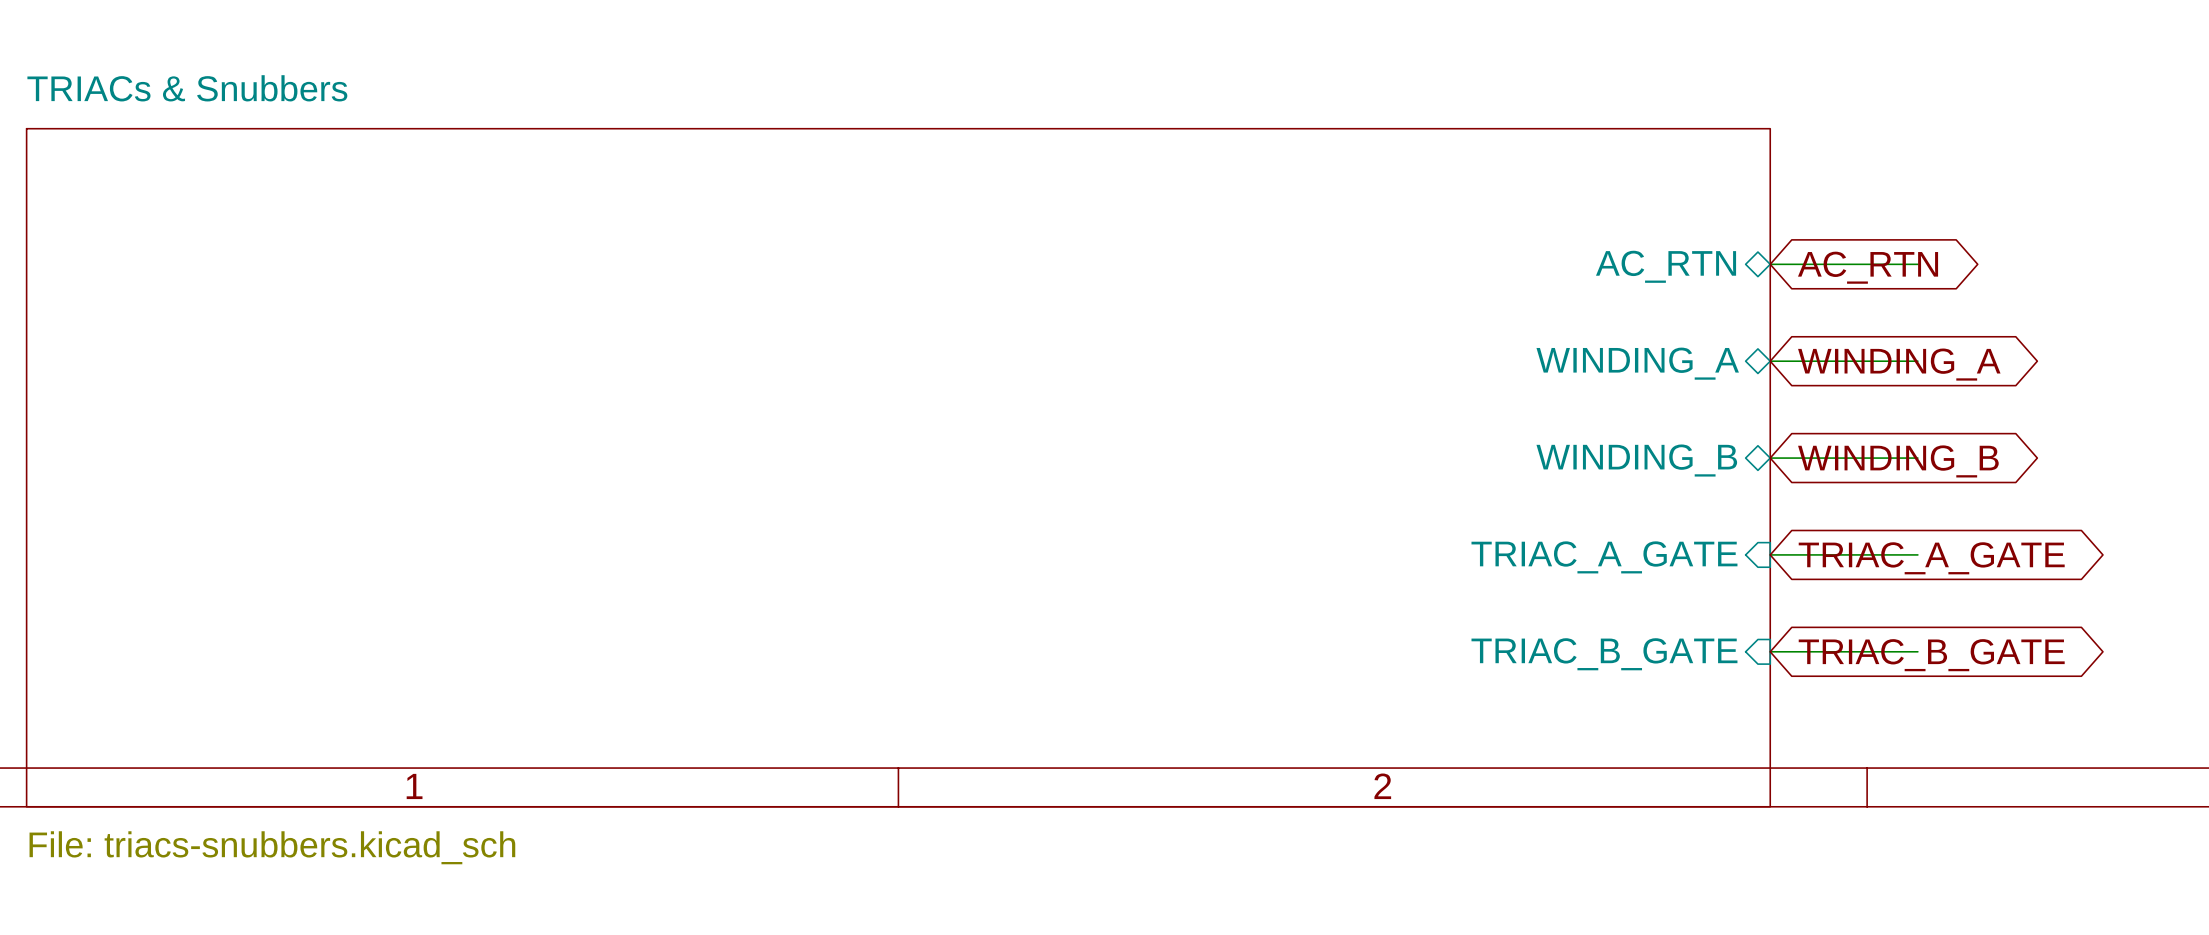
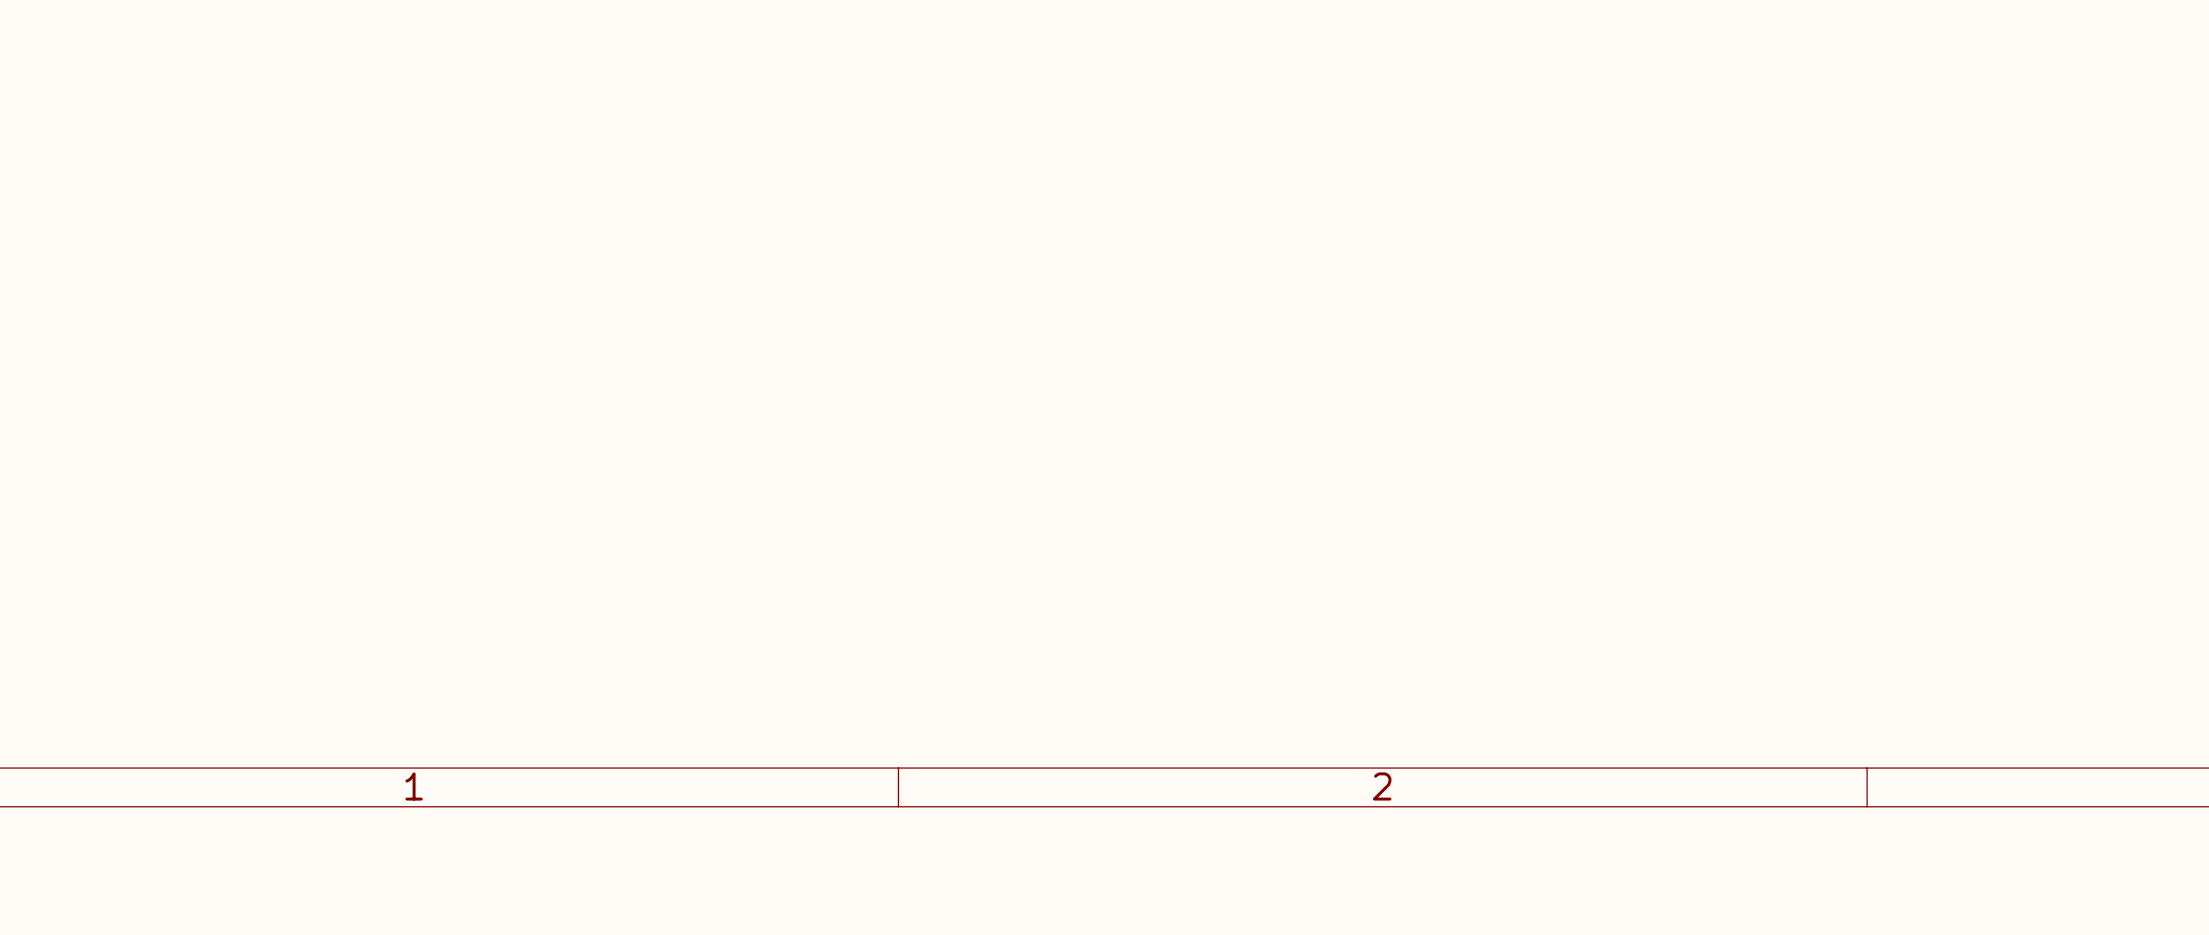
wire: (1770, 264) (1917, 264) -> none
sheet pin: AC_RTN (1666, 266) -> none
global label: AC_RTN (1868, 267) -> none
wire: (1770, 361) (1917, 361) -> none
sheet pin: WINDING_A (1637, 363) -> none
global label: WINDING_A (1899, 364) -> none
wire: (1770, 458) (1917, 458) -> none
sheet pin: WINDING_B (1636, 460) -> none
global label: WINDING_B (1898, 461) -> none
sheet TRIACs & Snubbers: File: triacs-snubbers.kicad_sch (898, 467) -> none
wire: (1770, 554) (1917, 554) -> none
sheet pin: TRIAC_A_GATE (1604, 557) -> none
global label: TRIAC_A_GATE (1931, 558) -> none
wire: (1770, 651) (1917, 651) -> none
sheet pin: TRIAC_B_GATE (1604, 654) -> none
global label: TRIAC_B_GATE (1931, 655) -> none

